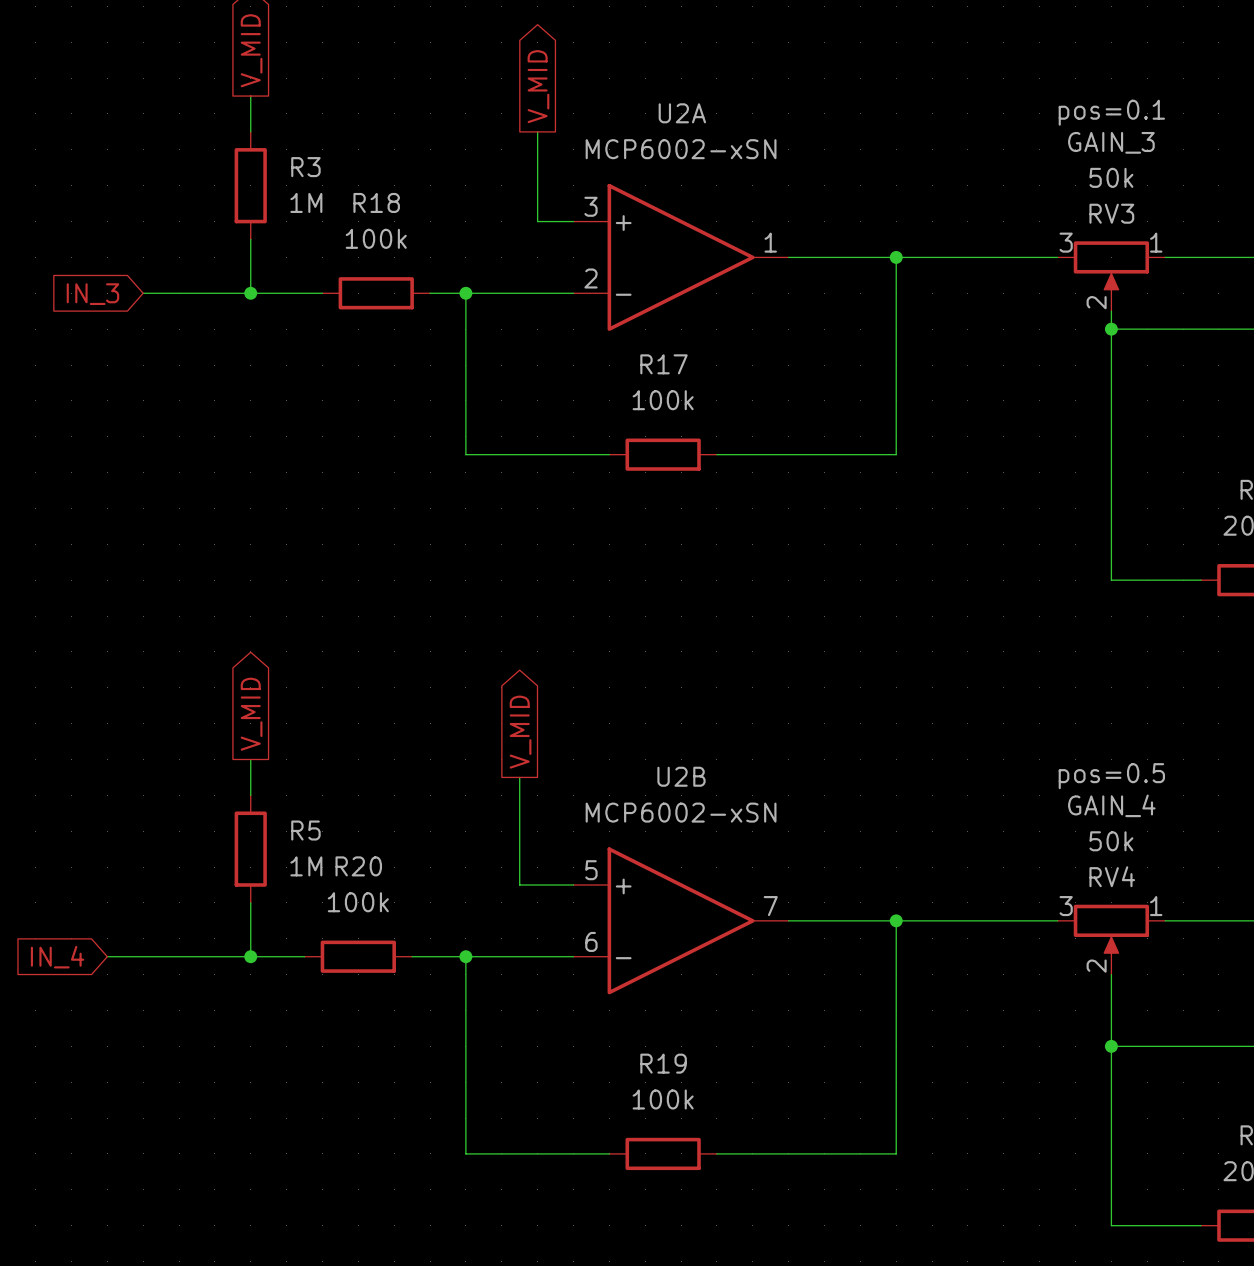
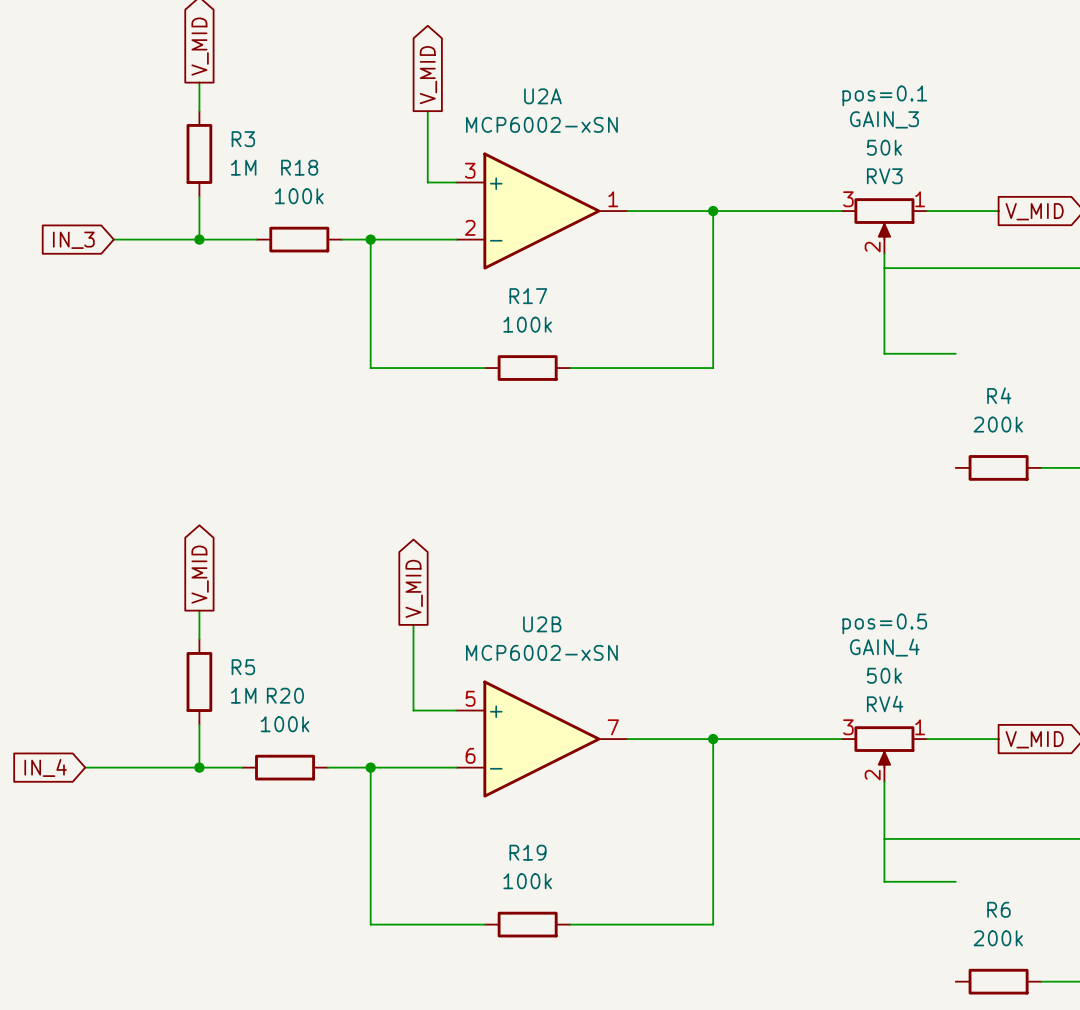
junction: (1111, 329) -> none
wire: (1111, 436) (1111, 580) (1201, 580) -> (884, 353) (955, 353)
junction: (1111, 1046) -> none
wire: (1111, 1100) (1111, 1225) (1201, 1225) -> (884, 881) (955, 881)

